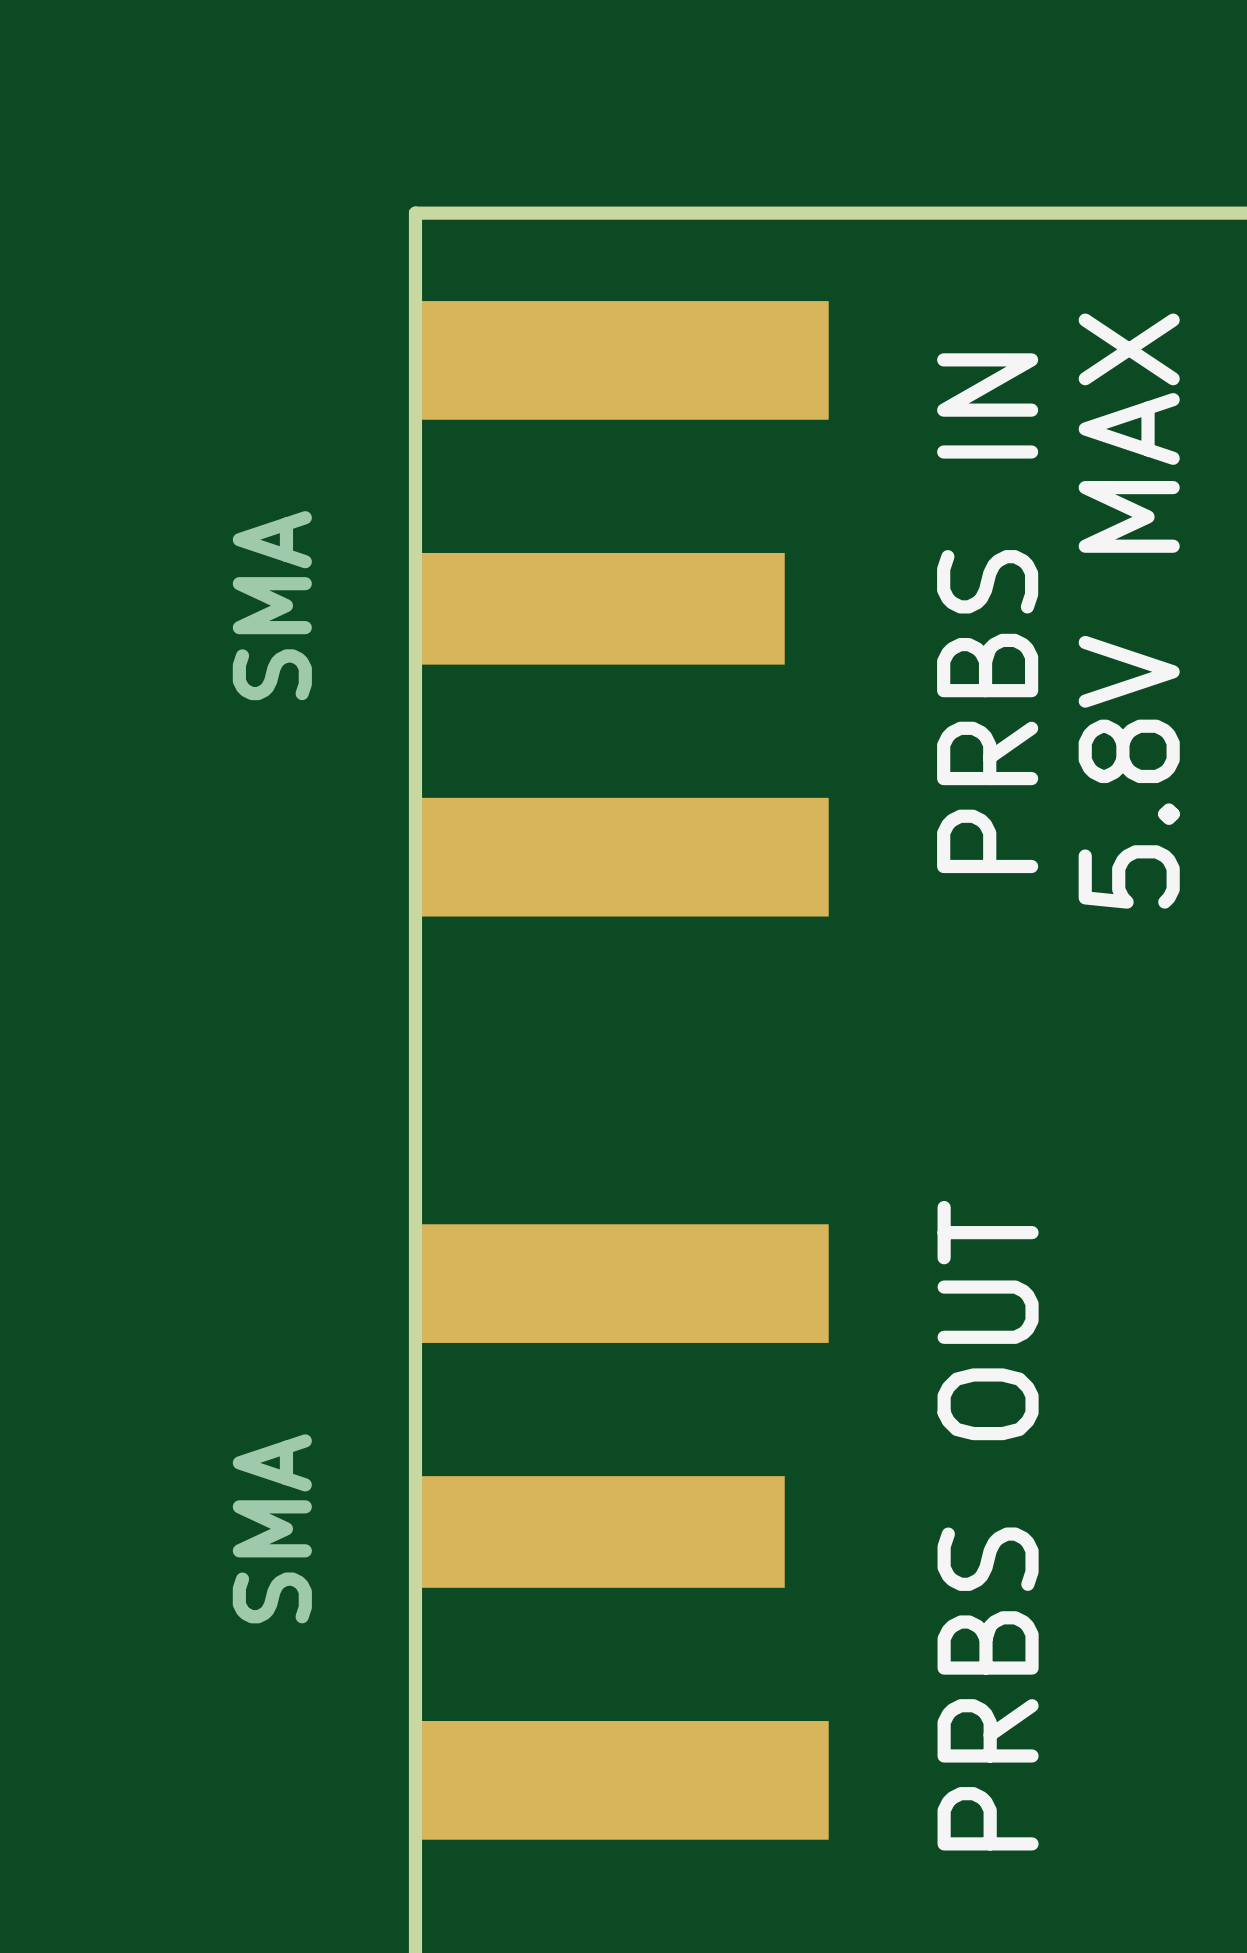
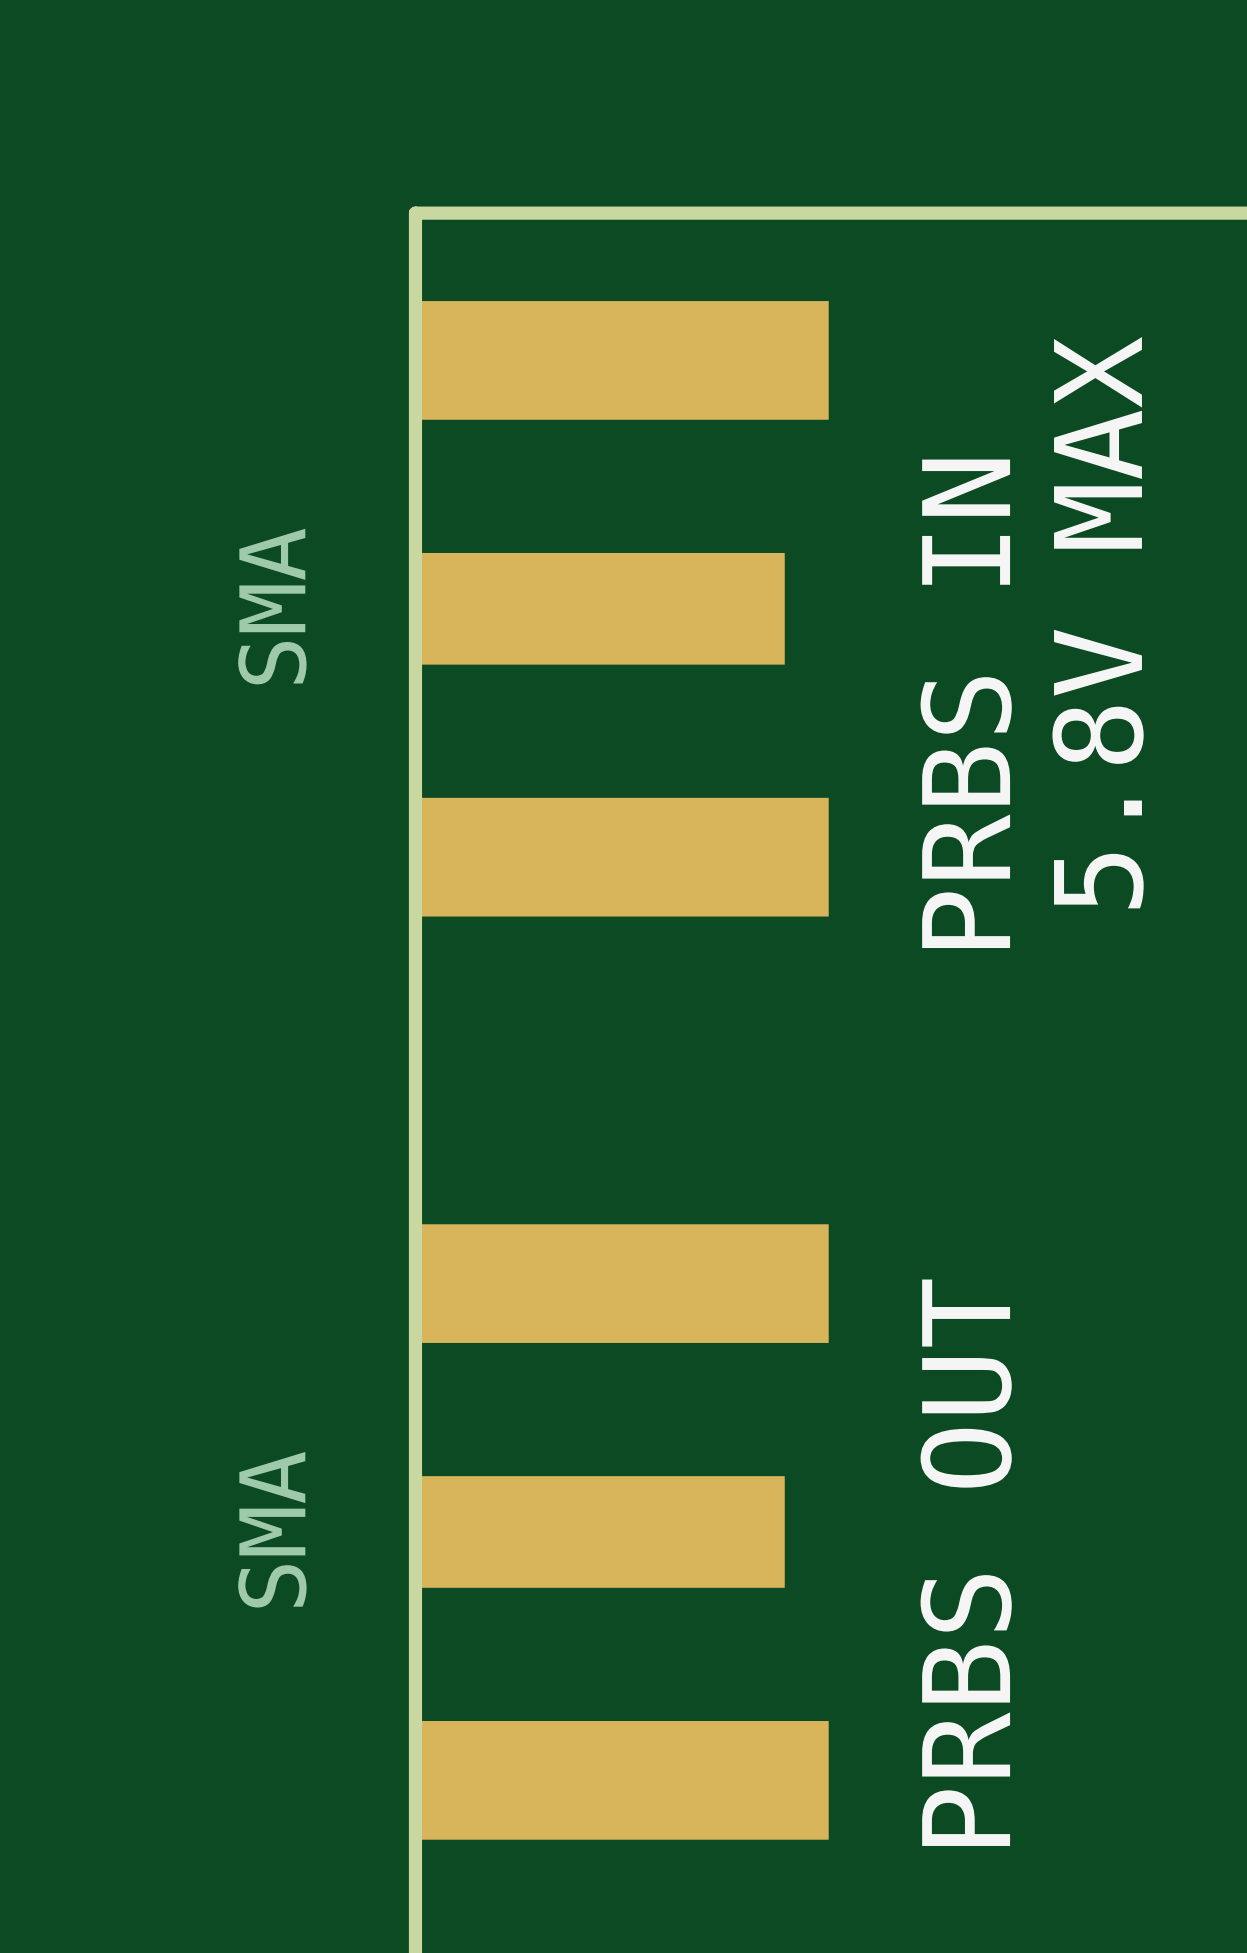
text position: 5.8V MAX (1129, 611) -> 5.8V MAX (1098, 622)
text position: PRBS IN (987, 613) -> PRBS IN (966, 703)
text position: PRBS OUT (988, 1525) -> PRBS OUT (966, 1562)

